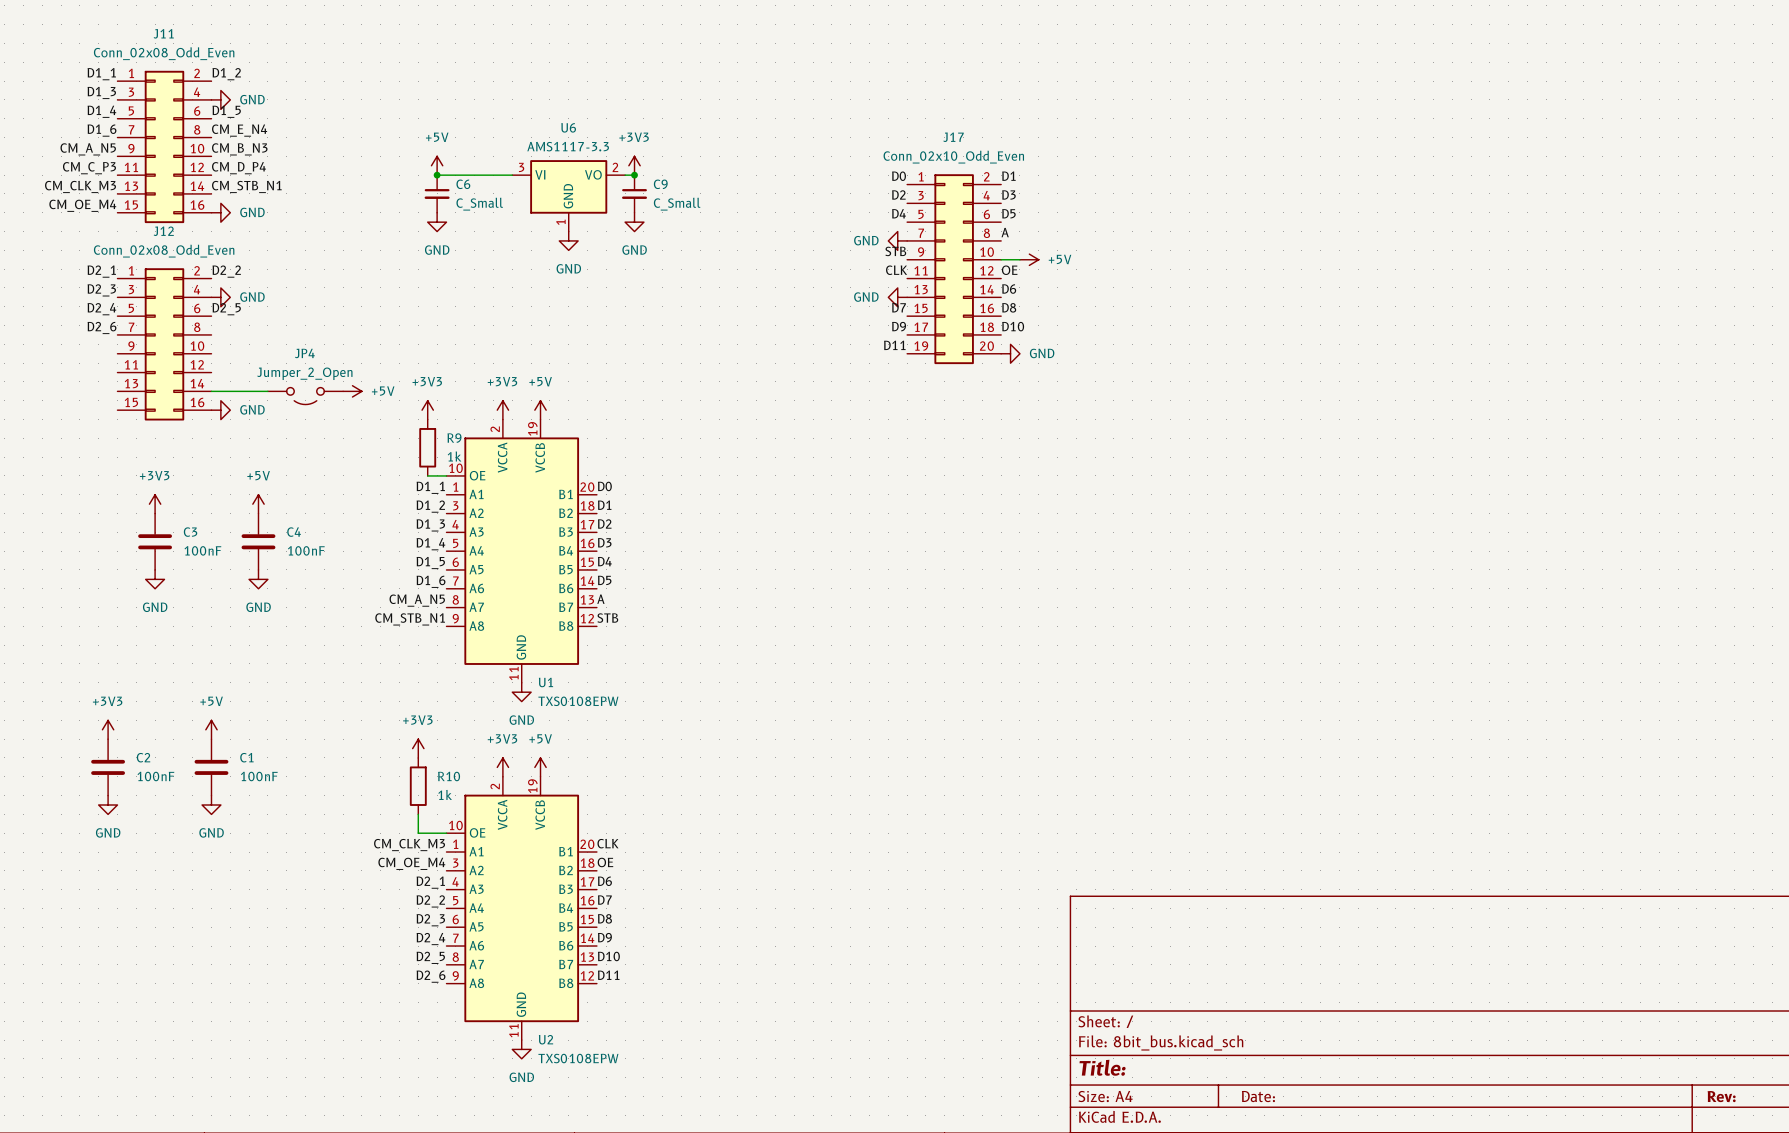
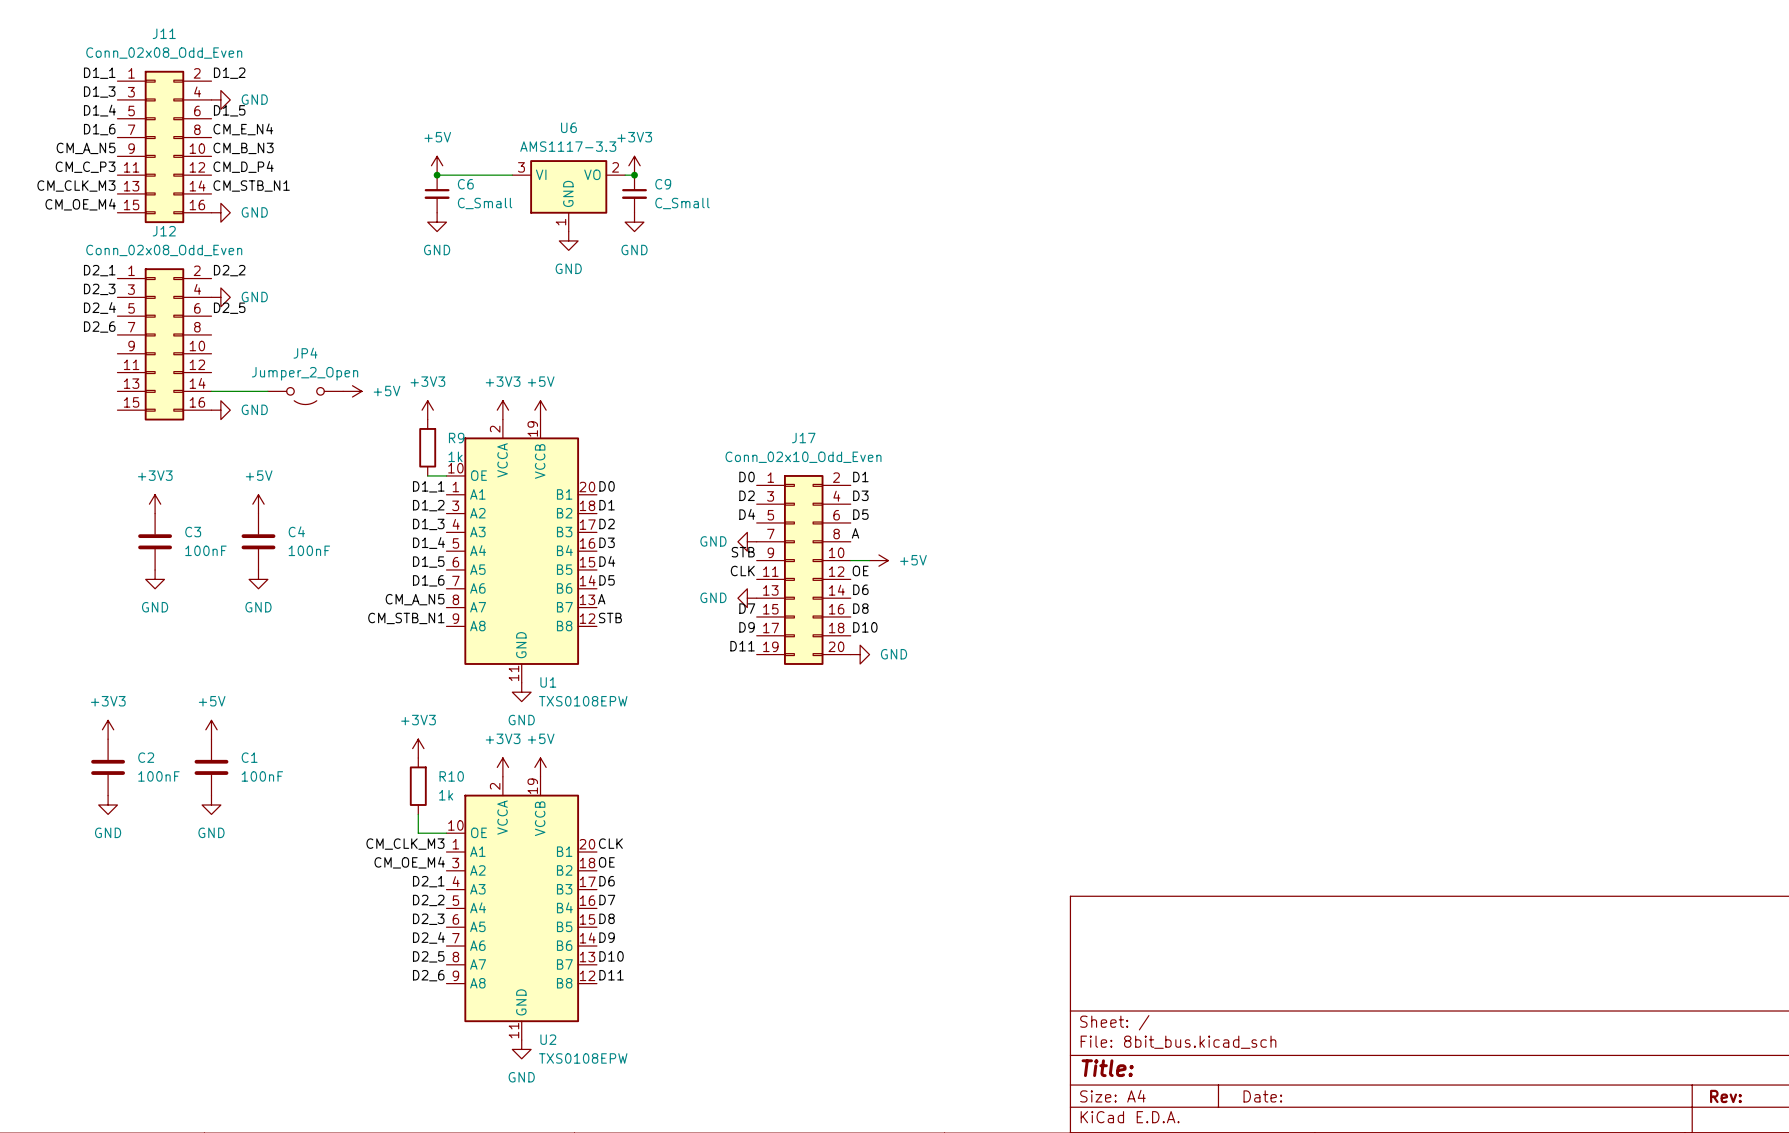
label: D0 (899, 176) -> none
label: D1 (1008, 176) -> none
label: D2 (898, 194) -> none
label: D3 (1008, 194) -> none
label: D4 (899, 213) -> none
label: D5 (1008, 213) -> none
label: A (1005, 232) -> none
power symbol: GND (897, 240) -> none
label: STB (895, 251) -> none
wire: (1001, 259) (1019, 259) -> none
power symbol: +5V (1029, 259) -> none
J17 position: (954, 269) -> (803, 569)
label: CLK (896, 270) -> none
label: OE (1009, 270) -> none
label: D6 (1009, 289) -> none
power symbol: GND (897, 297) -> none
label: D7 (899, 307) -> none
label: D8 (1009, 307) -> none
label: D9 (899, 326) -> none
label: D10 (1013, 326) -> none
label: D11 (894, 345) -> none
power symbol: GND (1010, 353) -> none
label: none -> D1 (860, 476)
label: none -> D0 (747, 476)
label: none -> D2 (747, 495)
label: none -> D3 (860, 495)
label: none -> D4 (747, 514)
label: none -> D5 (860, 514)
label: none -> A (855, 533)
power symbol: none -> GND (747, 541)
label: none -> STB (743, 552)
wire: none -> (850, 560) (869, 560)
power symbol: none -> +5V (878, 560)
label: none -> CLK (742, 570)
label: none -> OE (860, 570)
label: none -> D6 (860, 589)
power symbol: none -> GND (747, 598)
label: none -> D7 (747, 608)
label: none -> D8 (860, 608)
label: none -> D9 (747, 627)
label: none -> D10 (865, 627)
label: none -> D11 (742, 646)
power symbol: none -> GND (860, 654)

